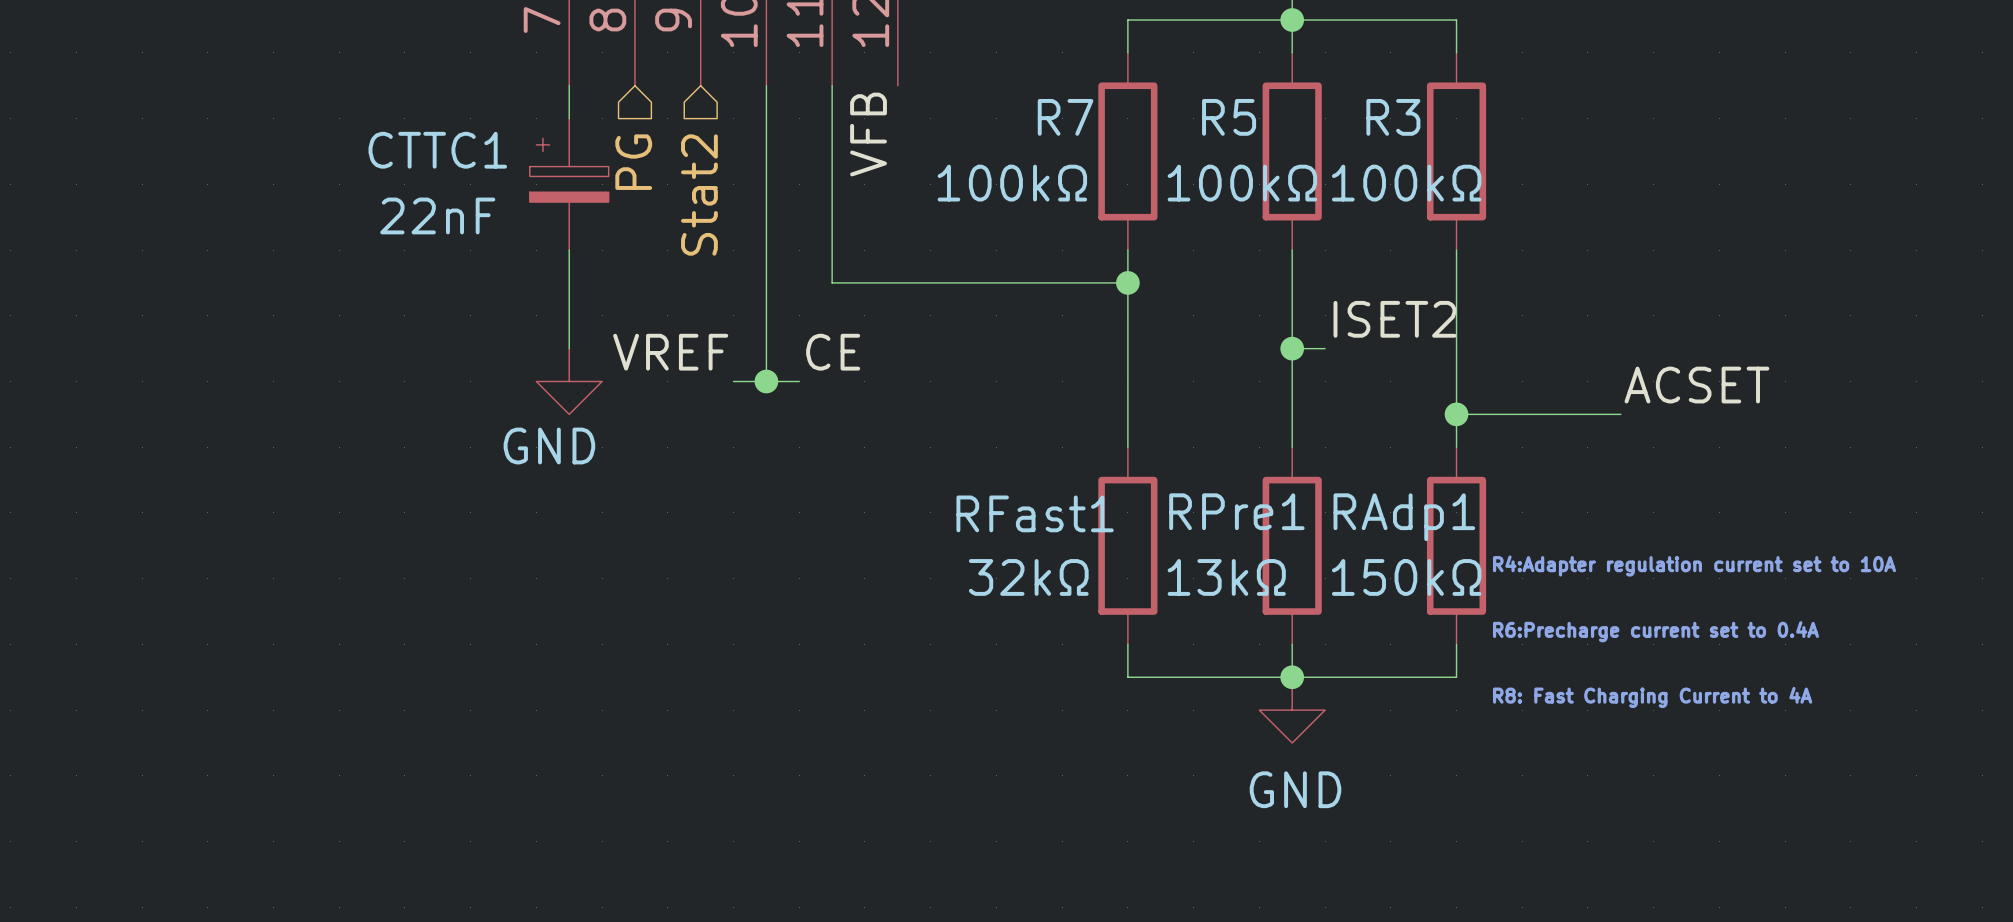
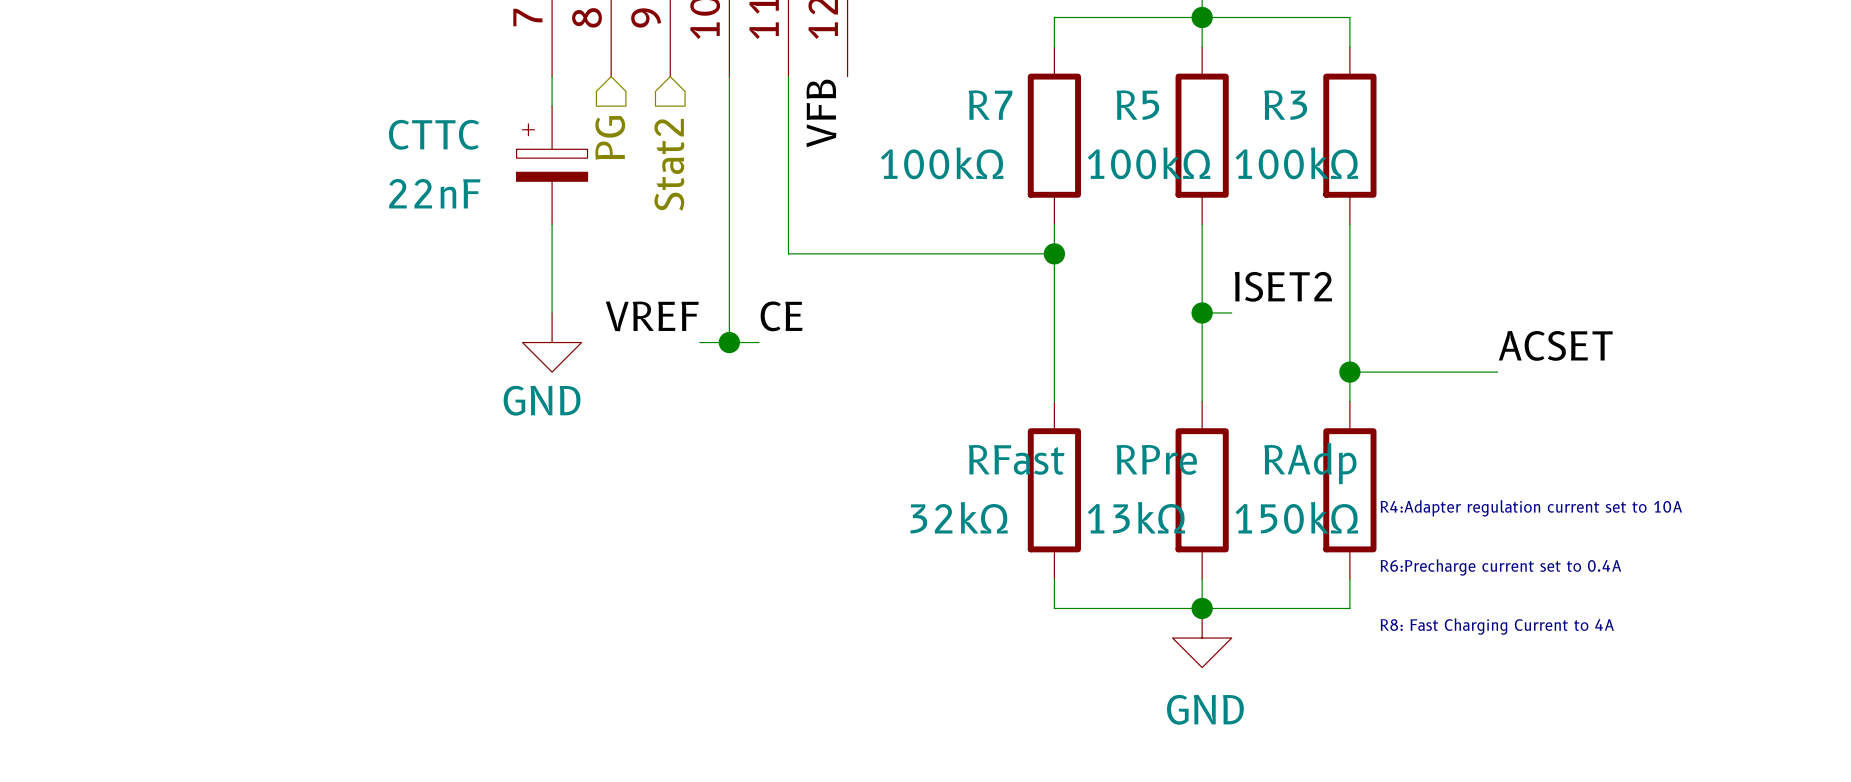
CTTC1 name: CTTC1 (437, 150) -> CTTC (433, 134)
RPre1 name: RPre1 (1236, 511) -> RPre (1156, 459)
RFast1 name: RFast1 (1035, 513) -> RFast (1016, 459)
RAdp1 name: RAdp1 (1404, 517) -> RAdp (1310, 463)

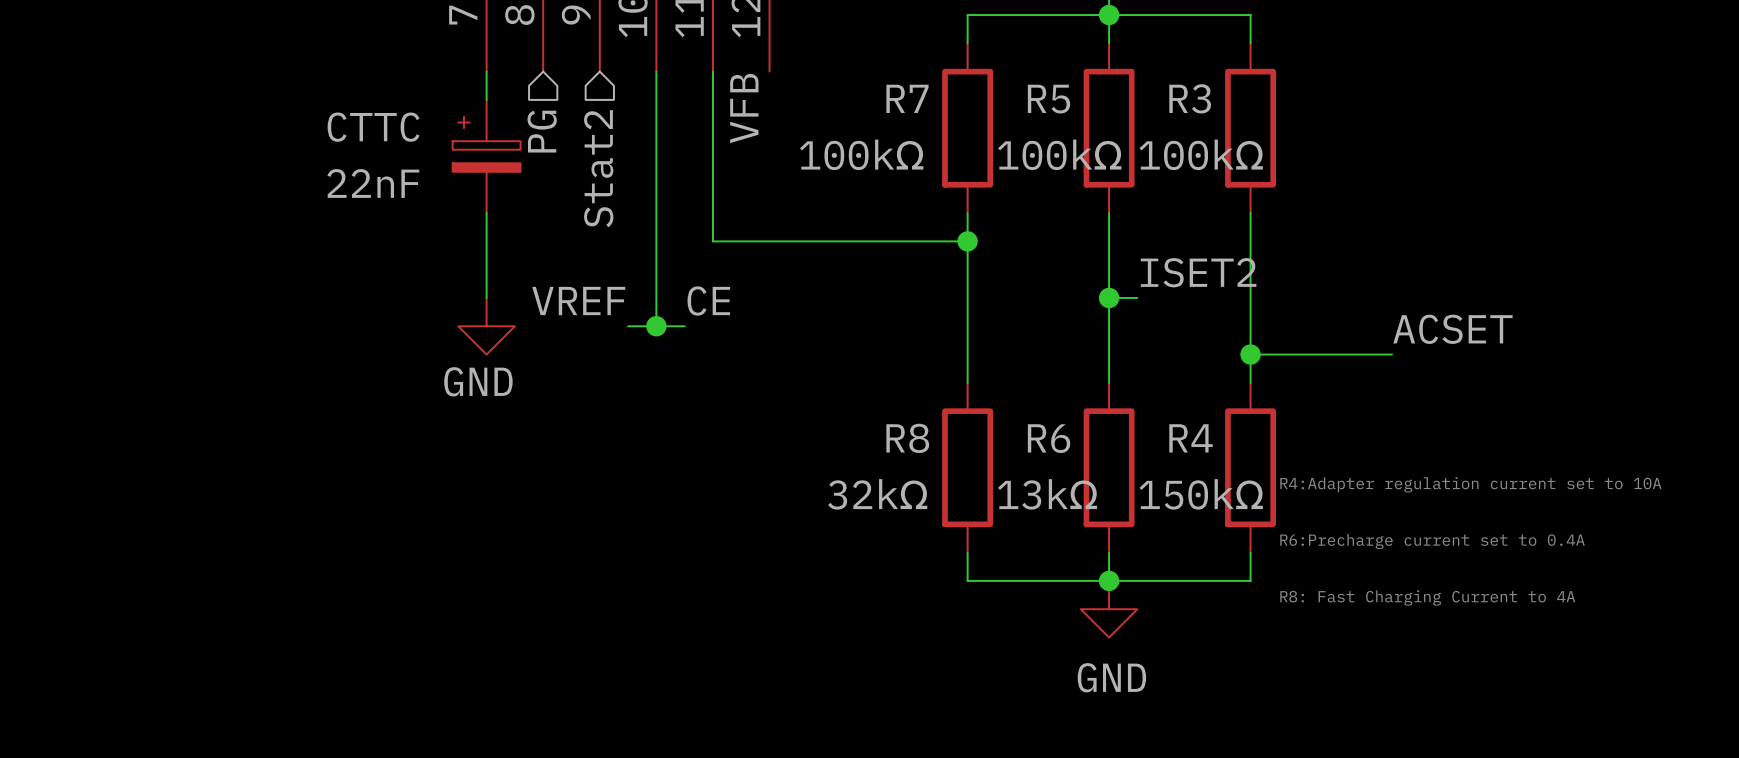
RFast name: RFast (1016, 459) -> R8 (907, 438)
RPre name: RPre (1156, 459) -> R6 (1049, 438)
RAdp name: RAdp (1310, 463) -> R4 (1191, 438)

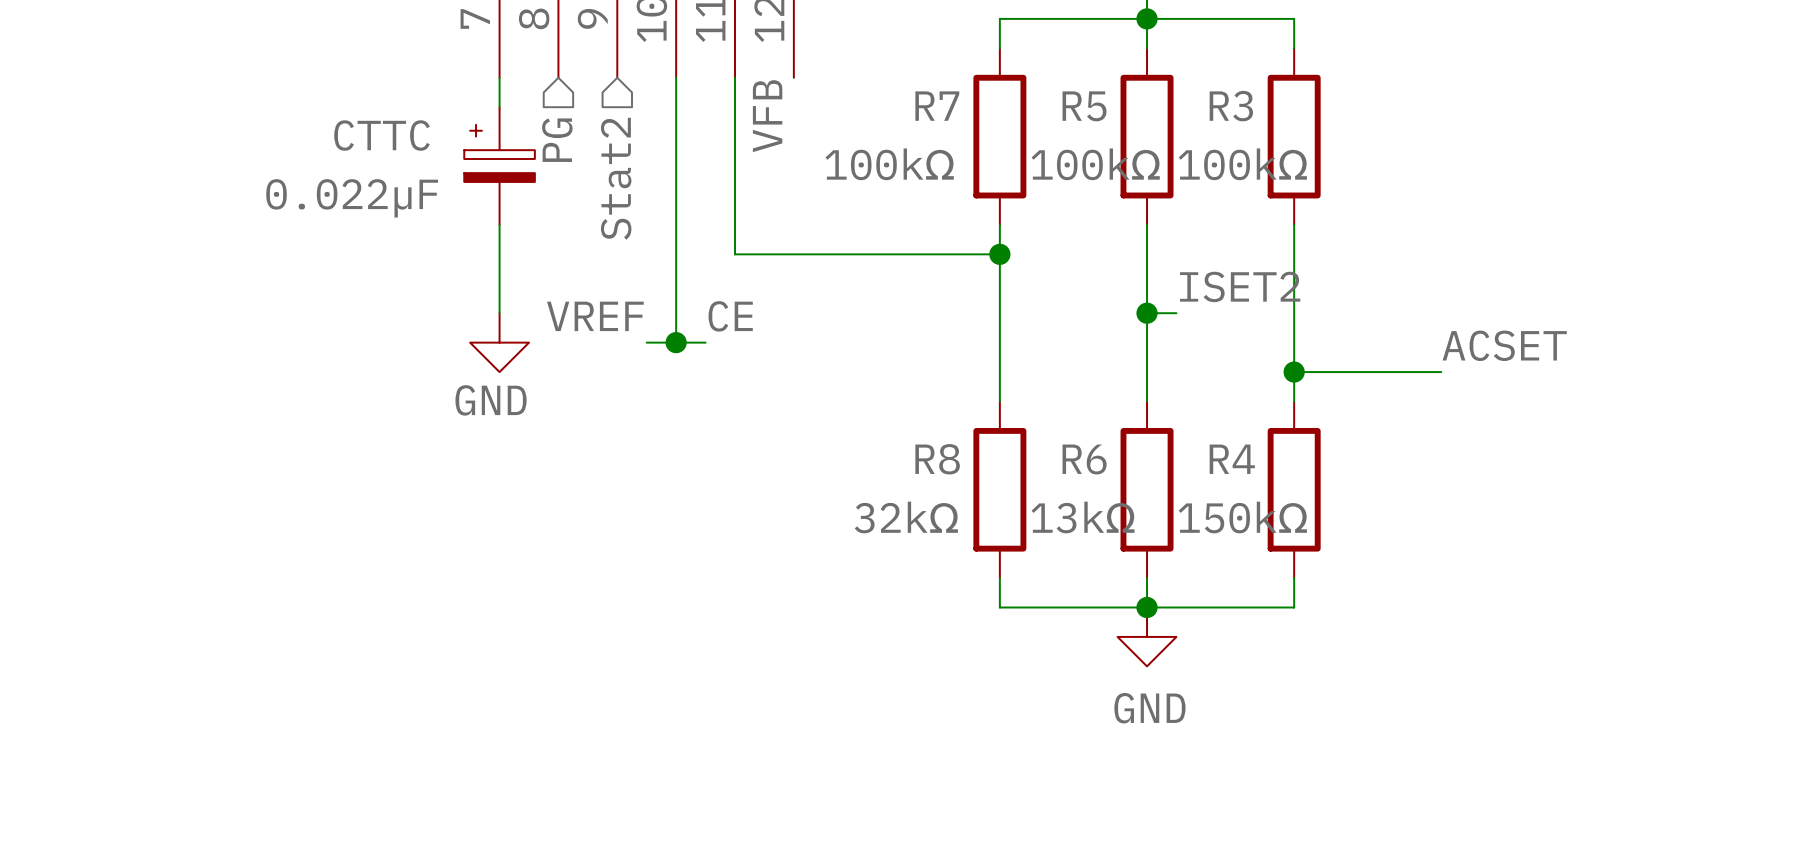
CTTC value: 22nF (373, 183) -> 0.022µF (352, 198)
text: R4:Adapter regulation current set to 10A (1470, 484) -> none
text: R6:Precharge current set to 0.4A (1432, 541) -> none
text: R8: Fast Charging Current to 4A (1427, 597) -> none

